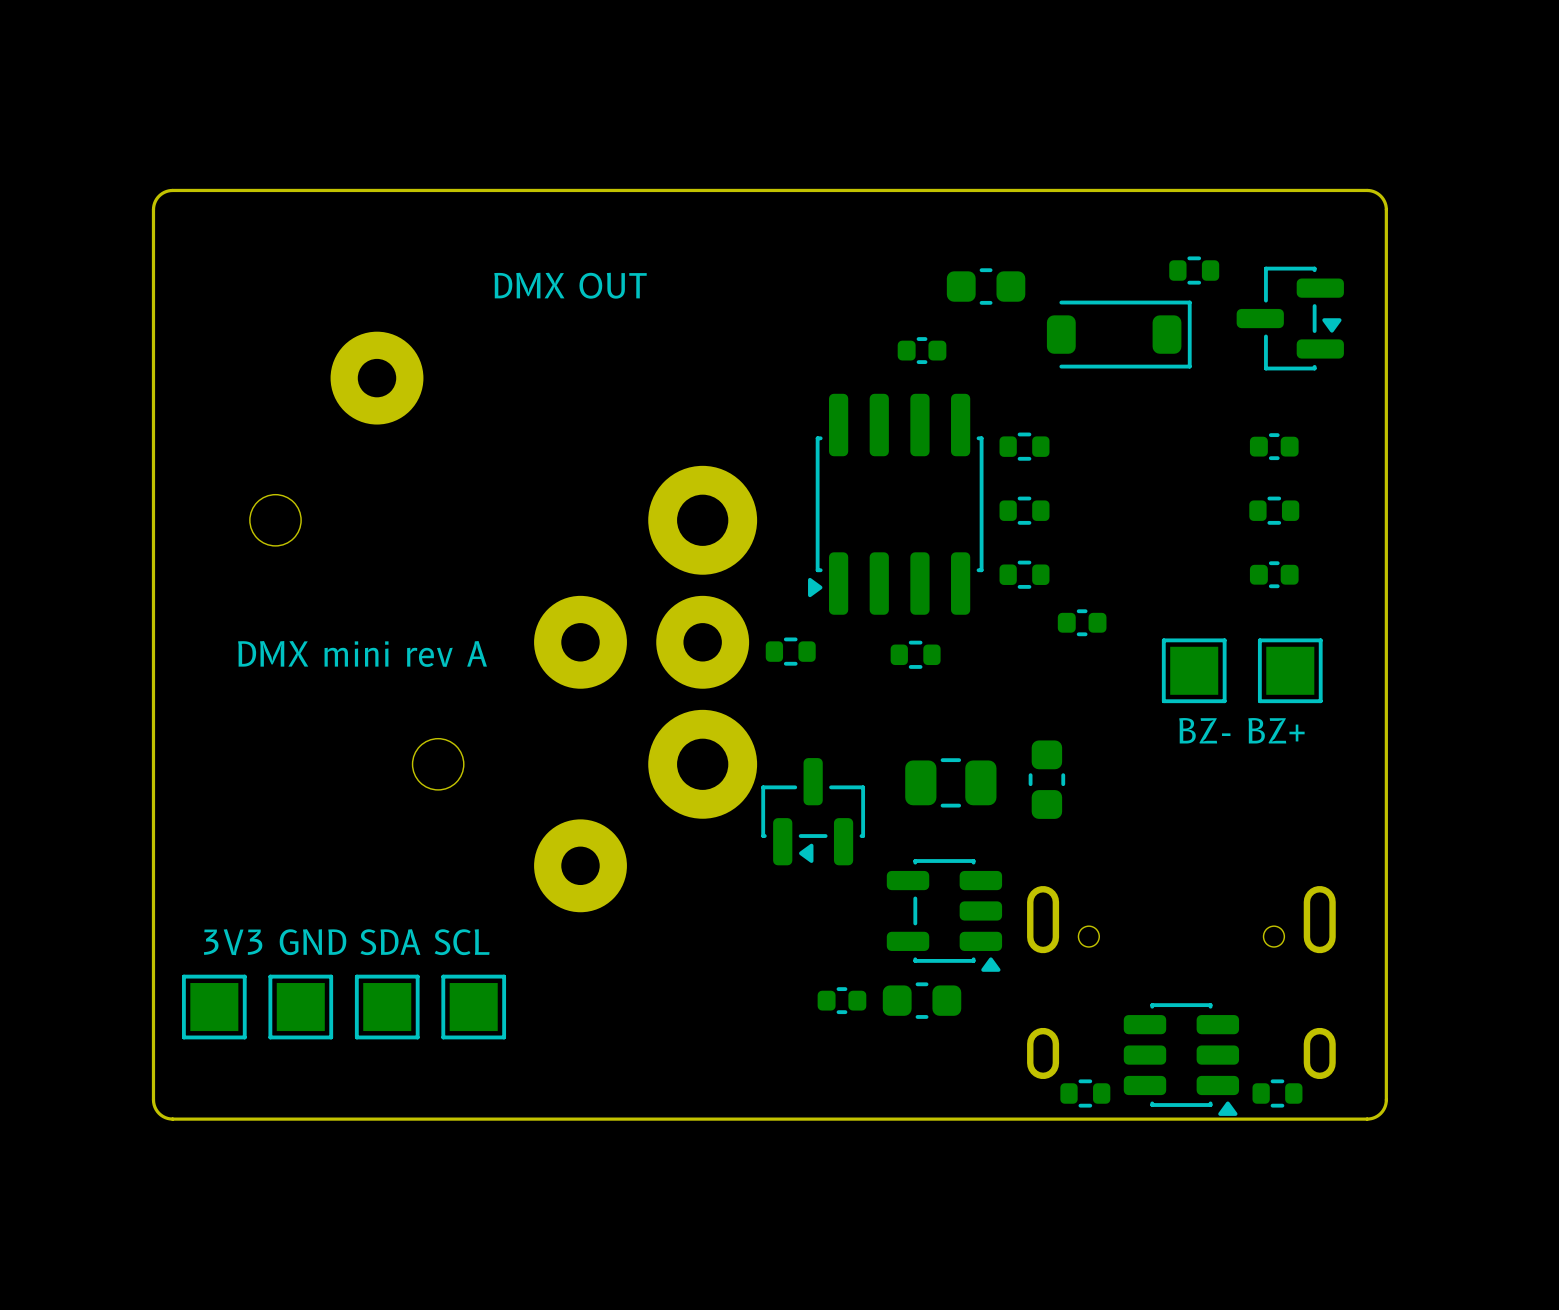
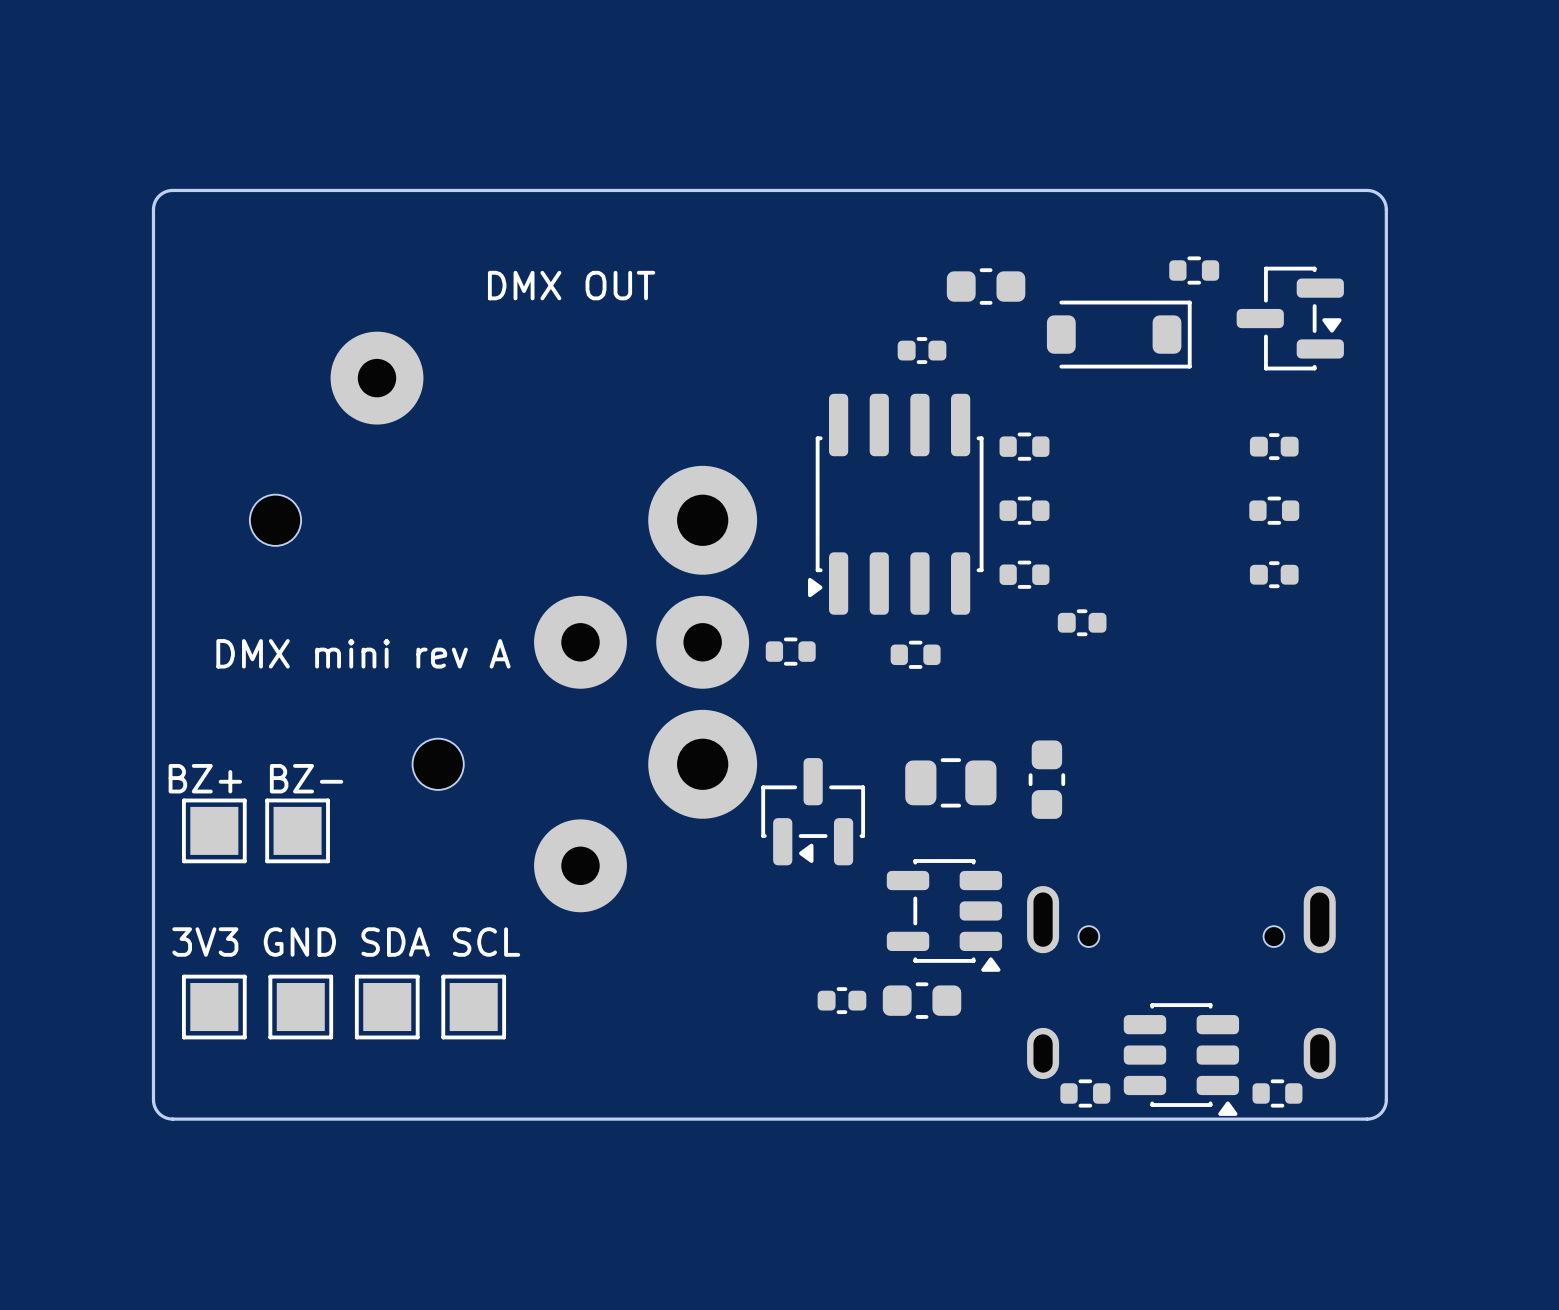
part: (1194, 670) -> none
part: (1290, 670) -> none
text: BZ- BZ+ (1241, 730) -> none
text: none -> BZ+ BZ- (255, 778)
part: none -> (214, 830)
part: none -> (297, 830)

